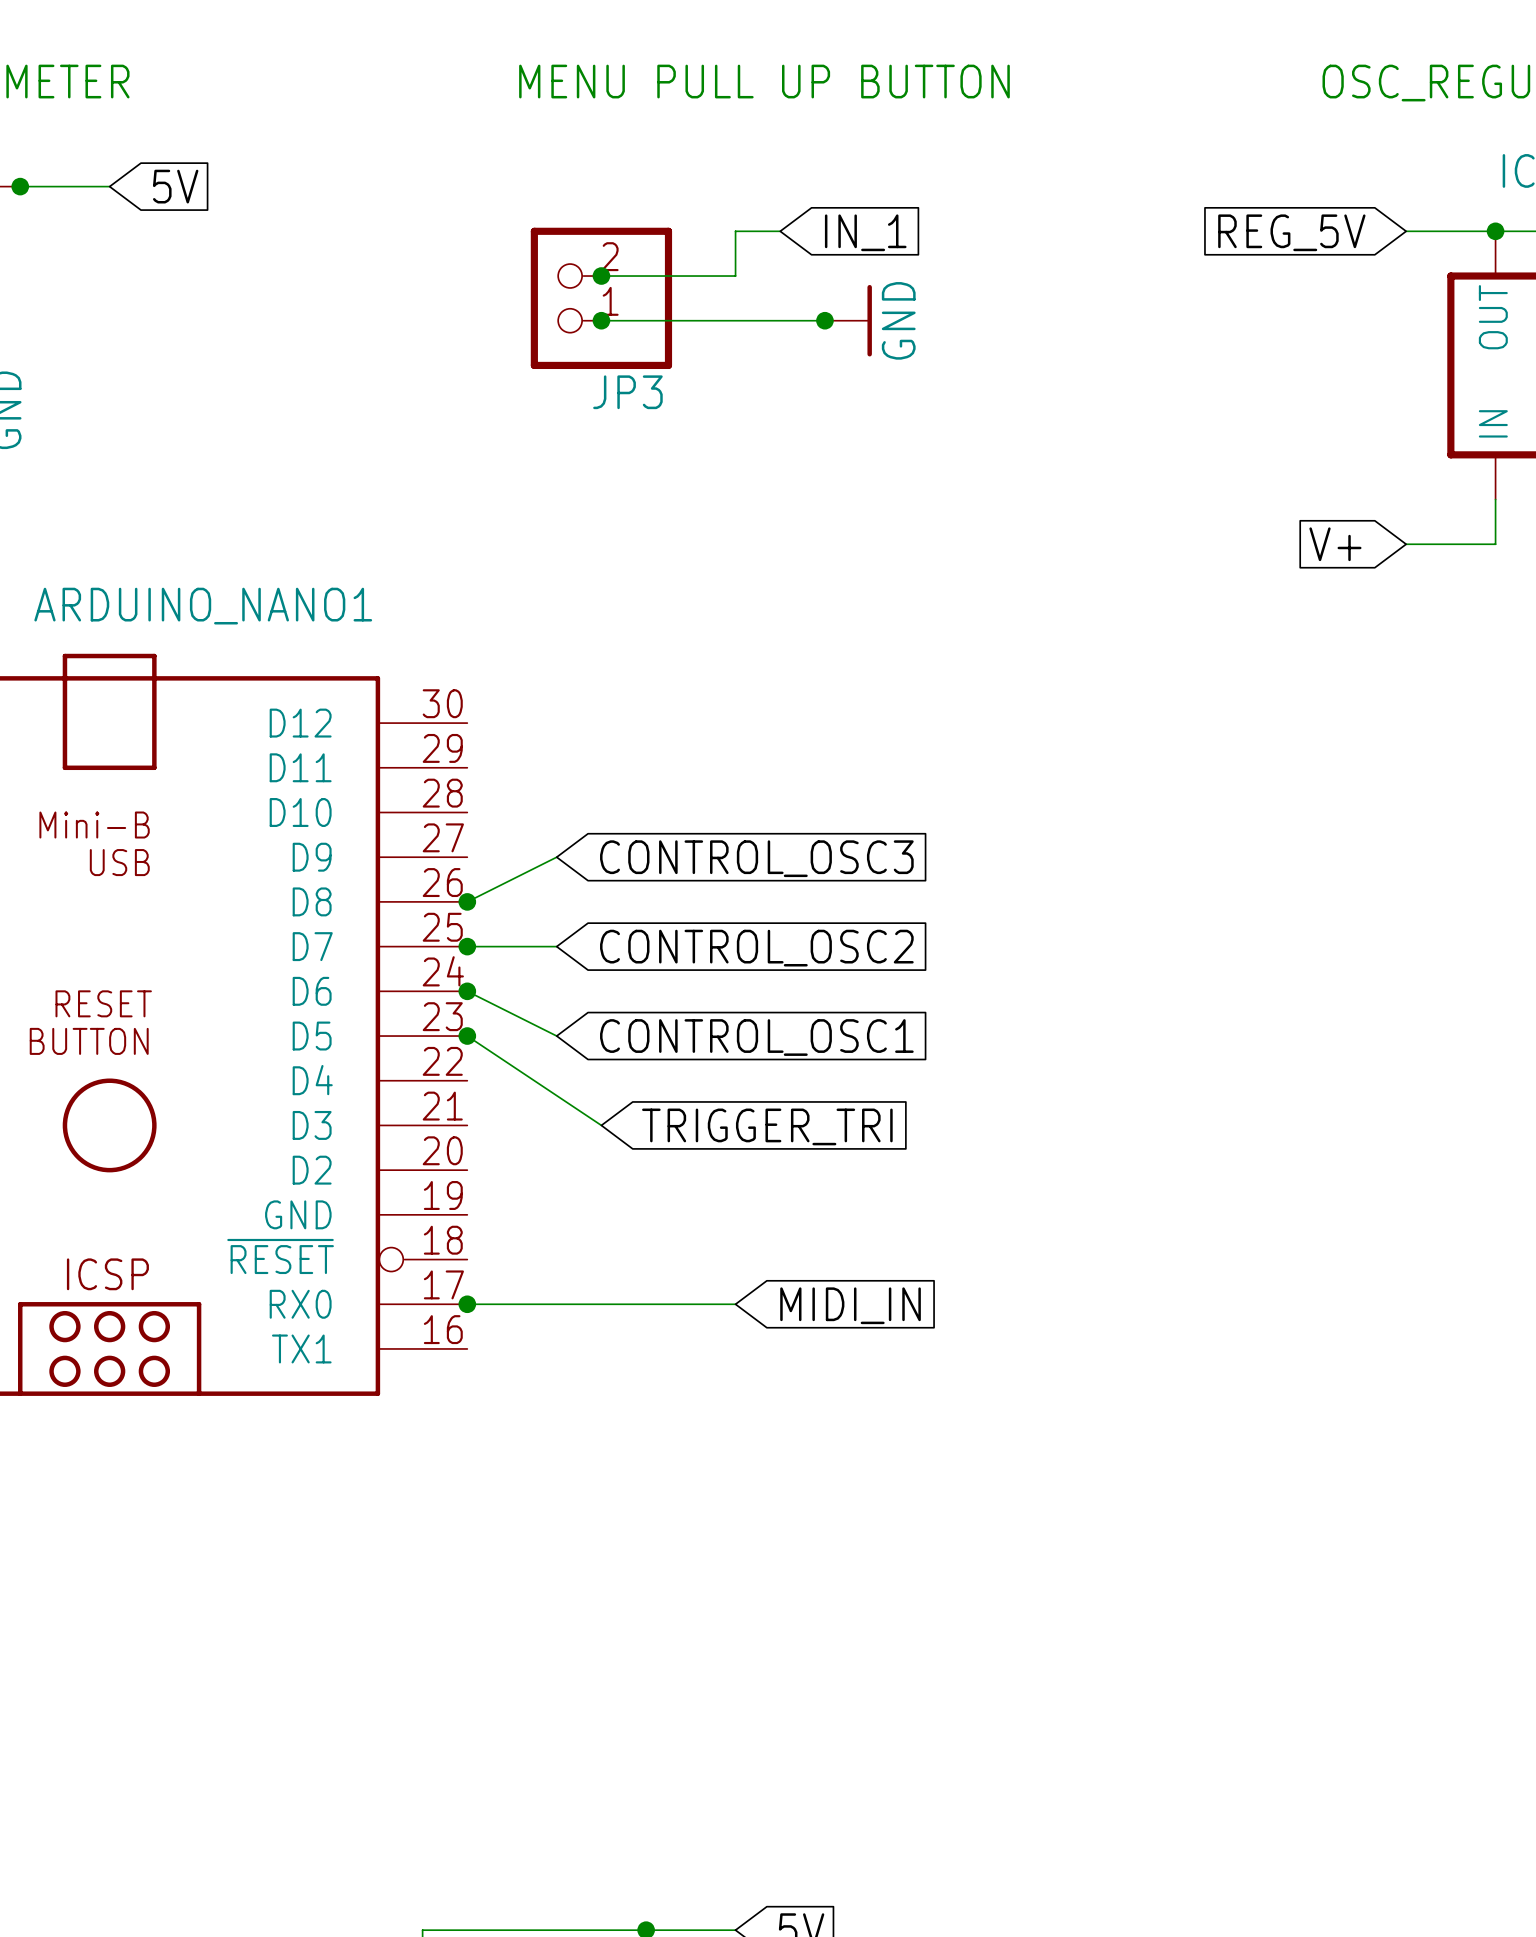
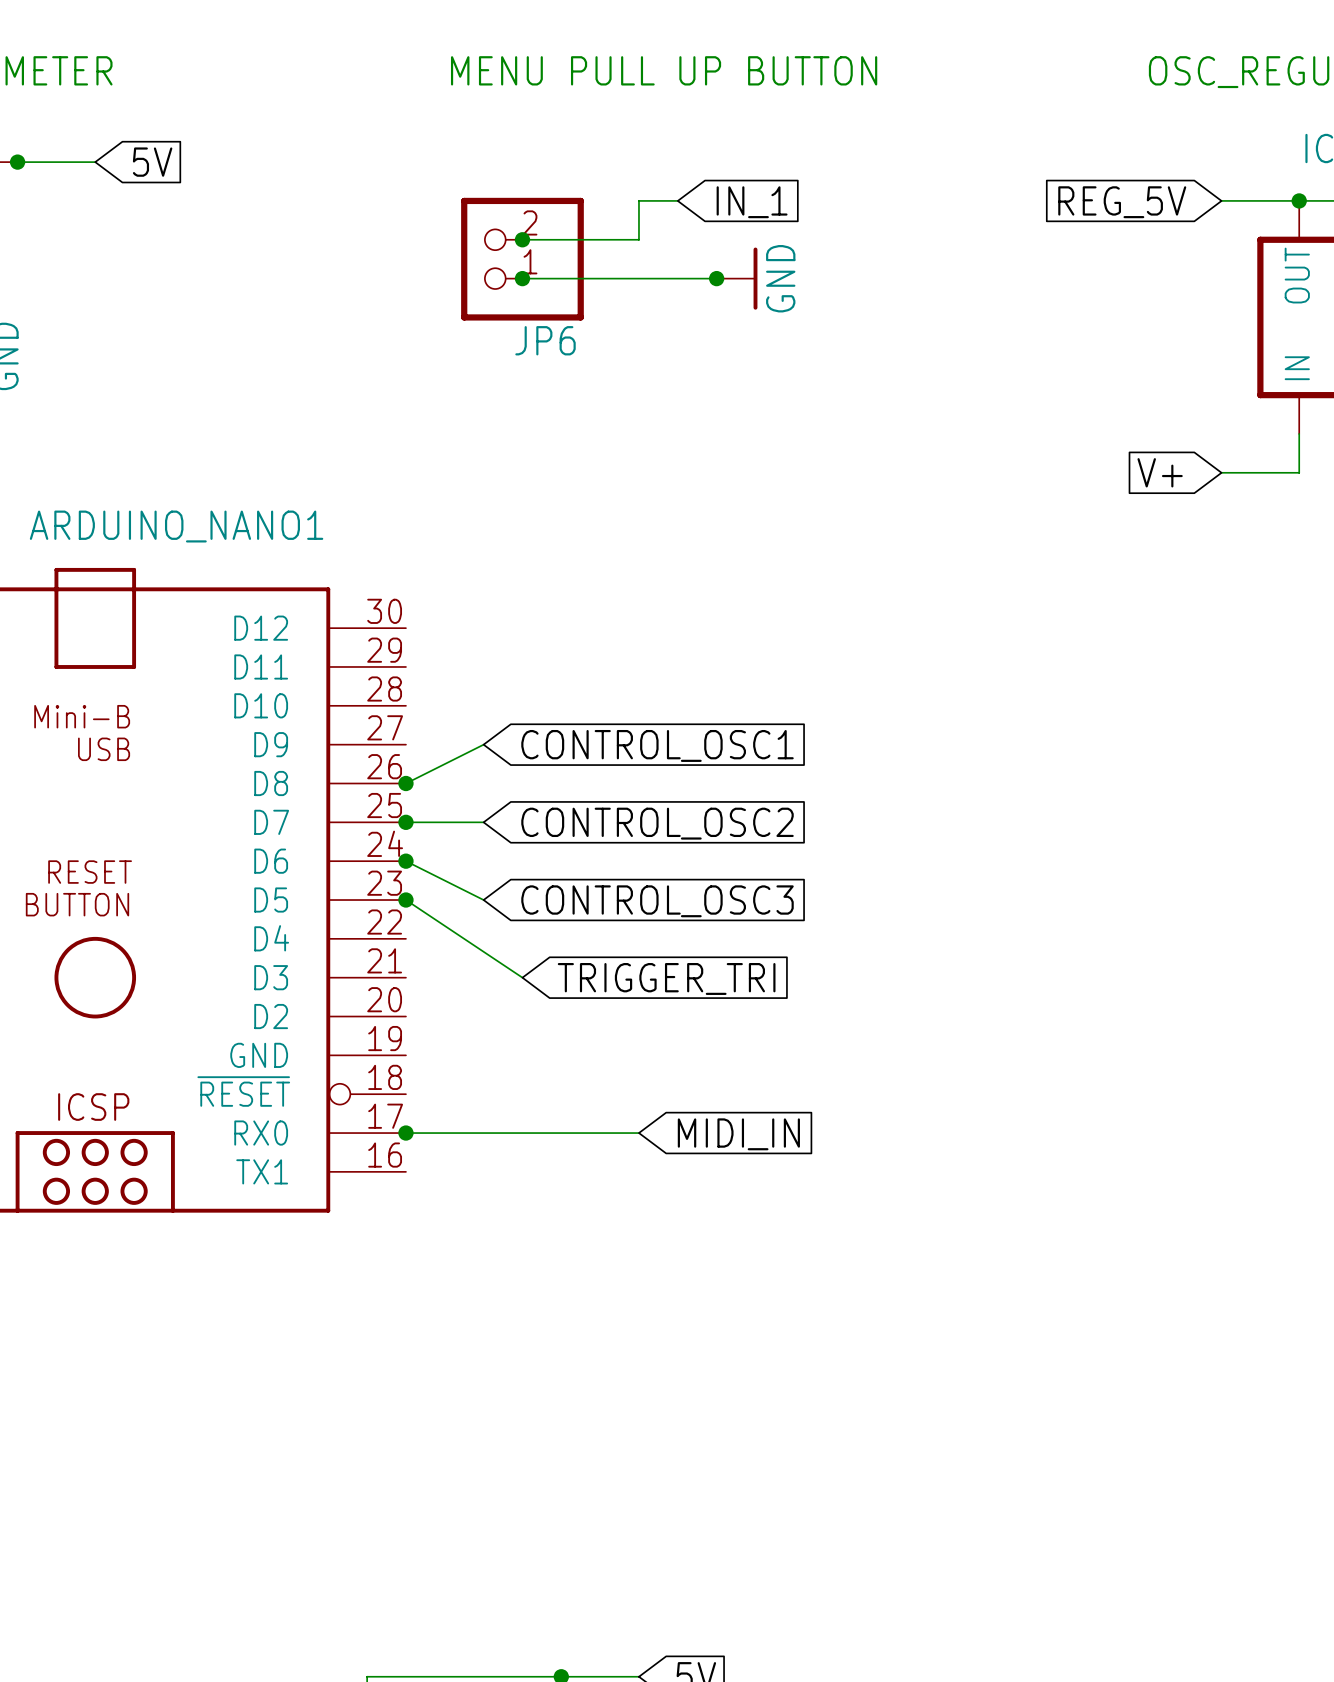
JP3 name: JP3 (627, 392) -> JP6 (545, 340)
global label: CONTROL_OSC3 (756, 858) -> CONTROL_OSC1 (657, 745)
global label: CONTROL_OSC1 (756, 1037) -> CONTROL_OSC3 (657, 901)

